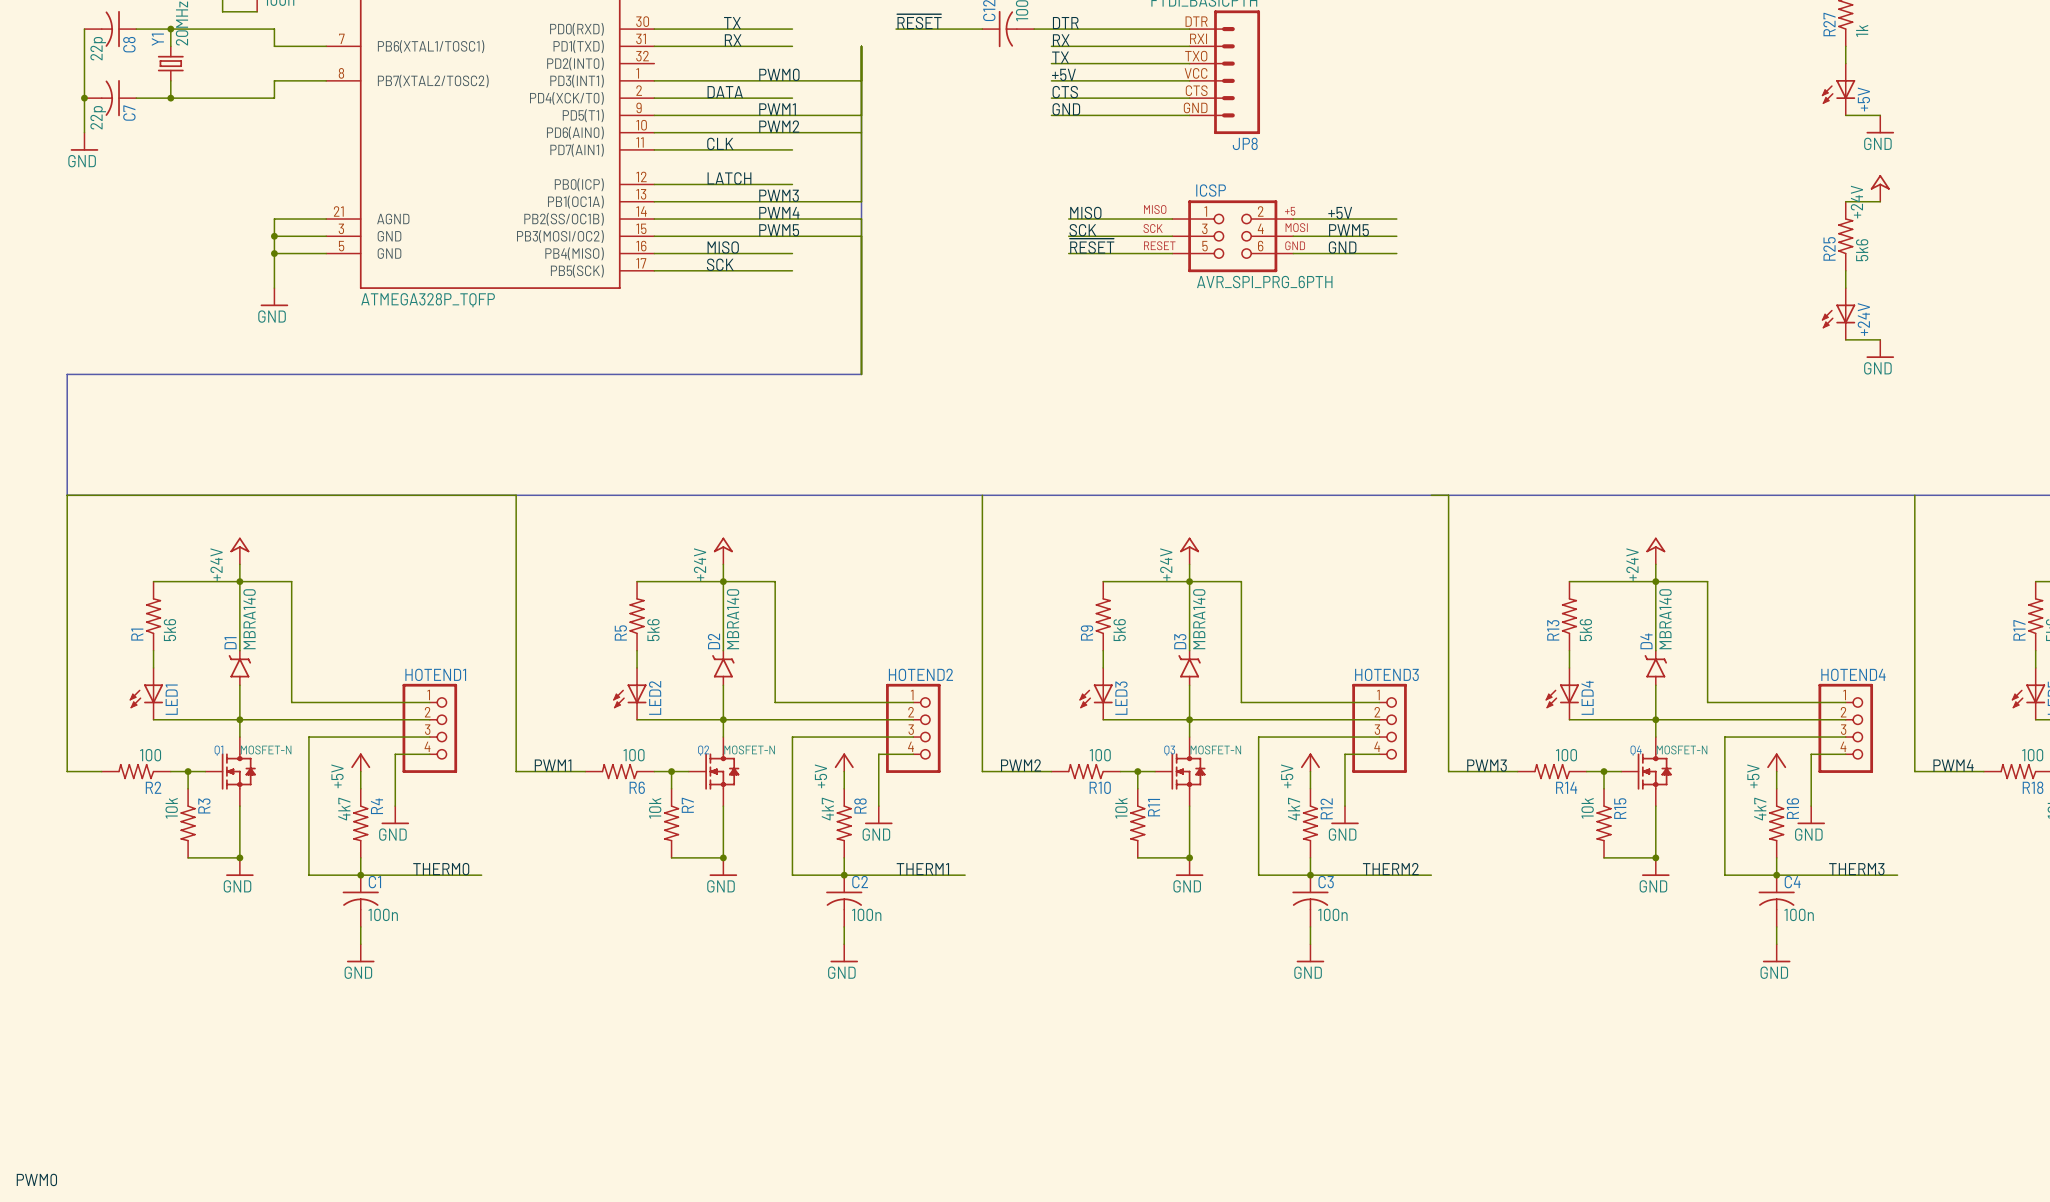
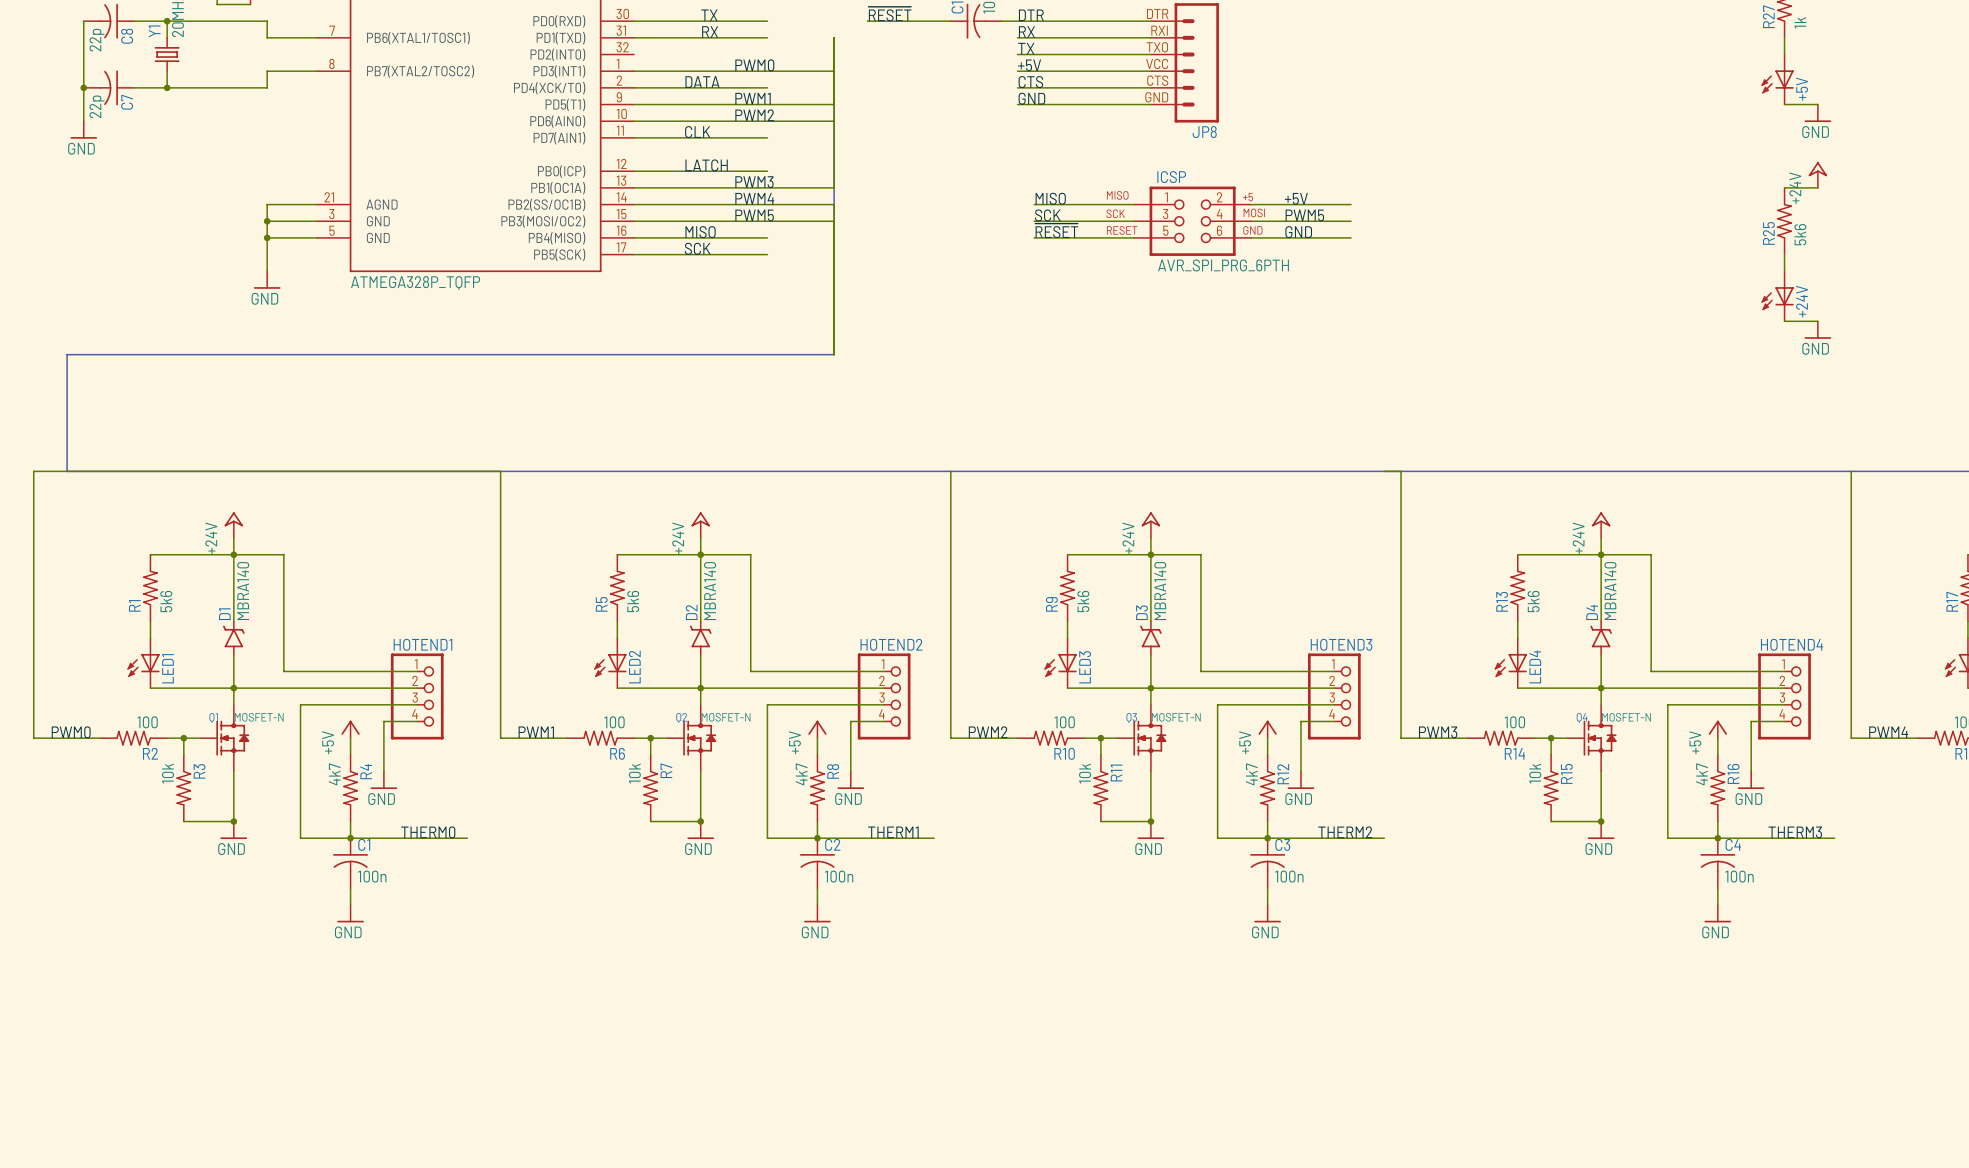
wire: (67, 495) (67, 771) -> (67, 471) (33, 471) (33, 738) (67, 738)
label: none -> PWM0 (71, 732)
label: PWM0 (36, 1179) -> none

